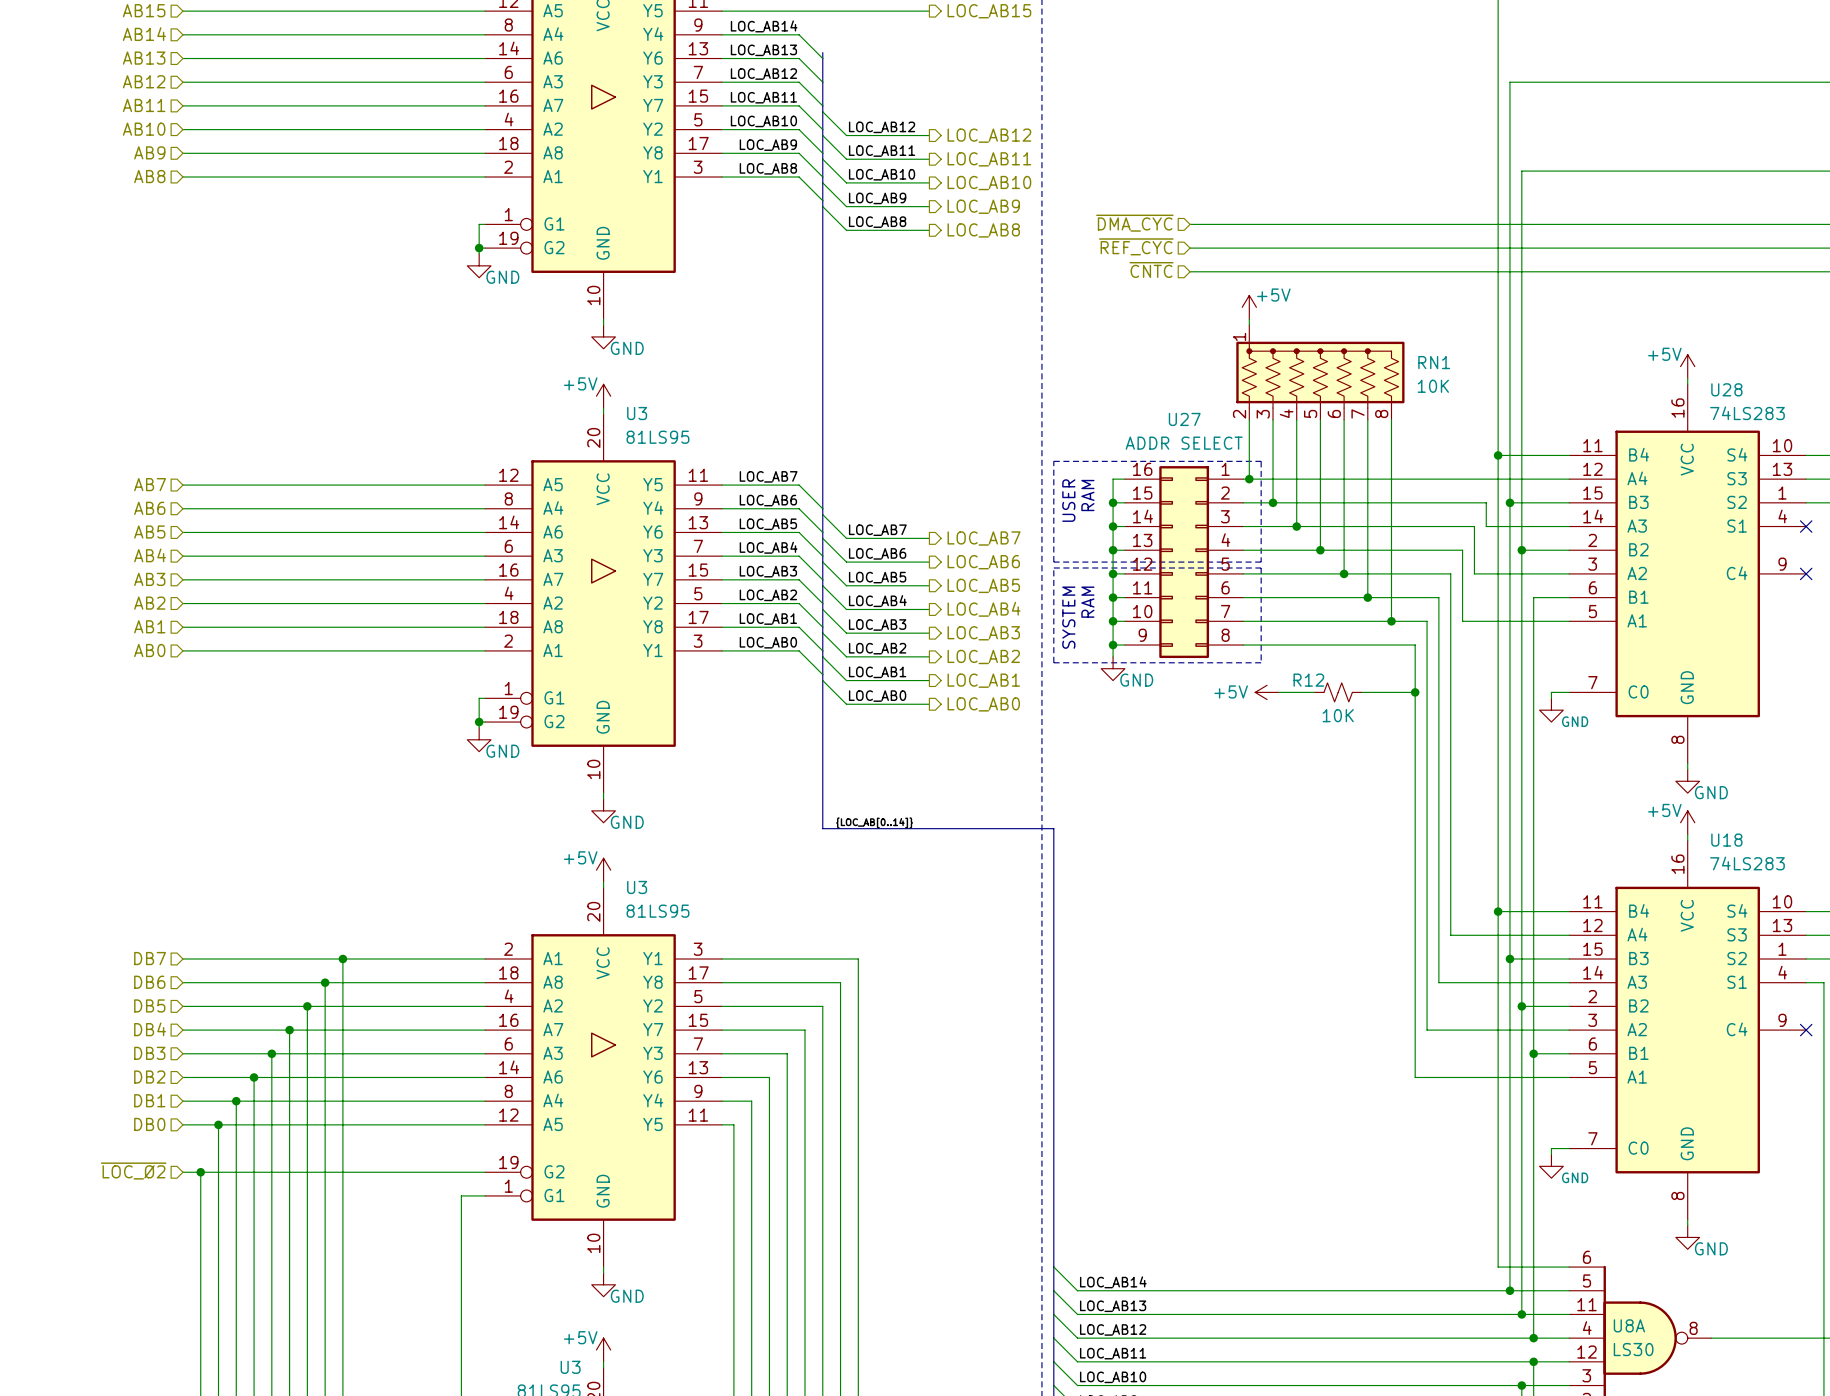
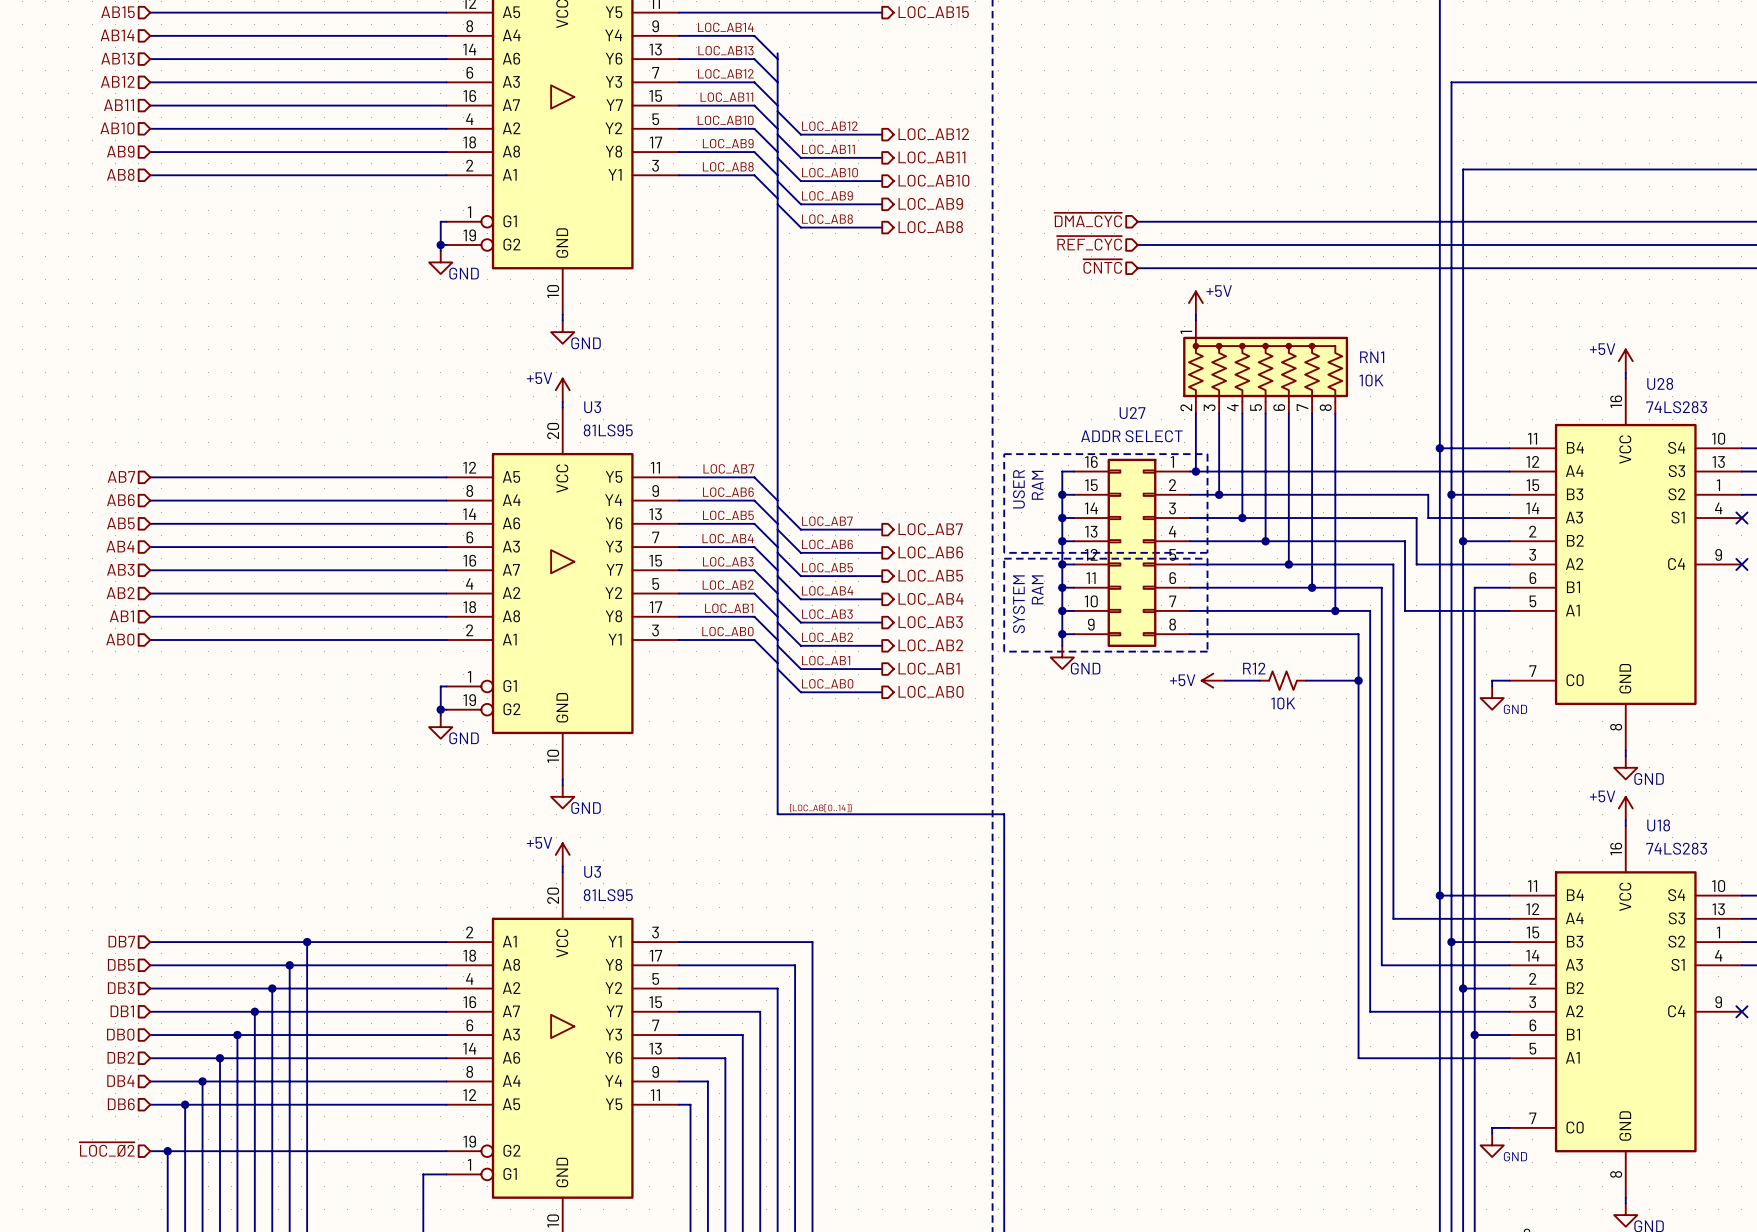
hierarchical label: DB6 (149, 982) -> DB5 (121, 964)
hierarchical label: DB5 (149, 1005) -> DB3 (121, 988)
hierarchical label: DB4 (150, 1029) -> DB1 (122, 1011)
hierarchical label: DB3 (149, 1053) -> DB0 (120, 1034)
hierarchical label: DB1 (149, 1100) -> DB4 (120, 1081)
hierarchical label: DB0 (149, 1124) -> DB6 (121, 1104)

